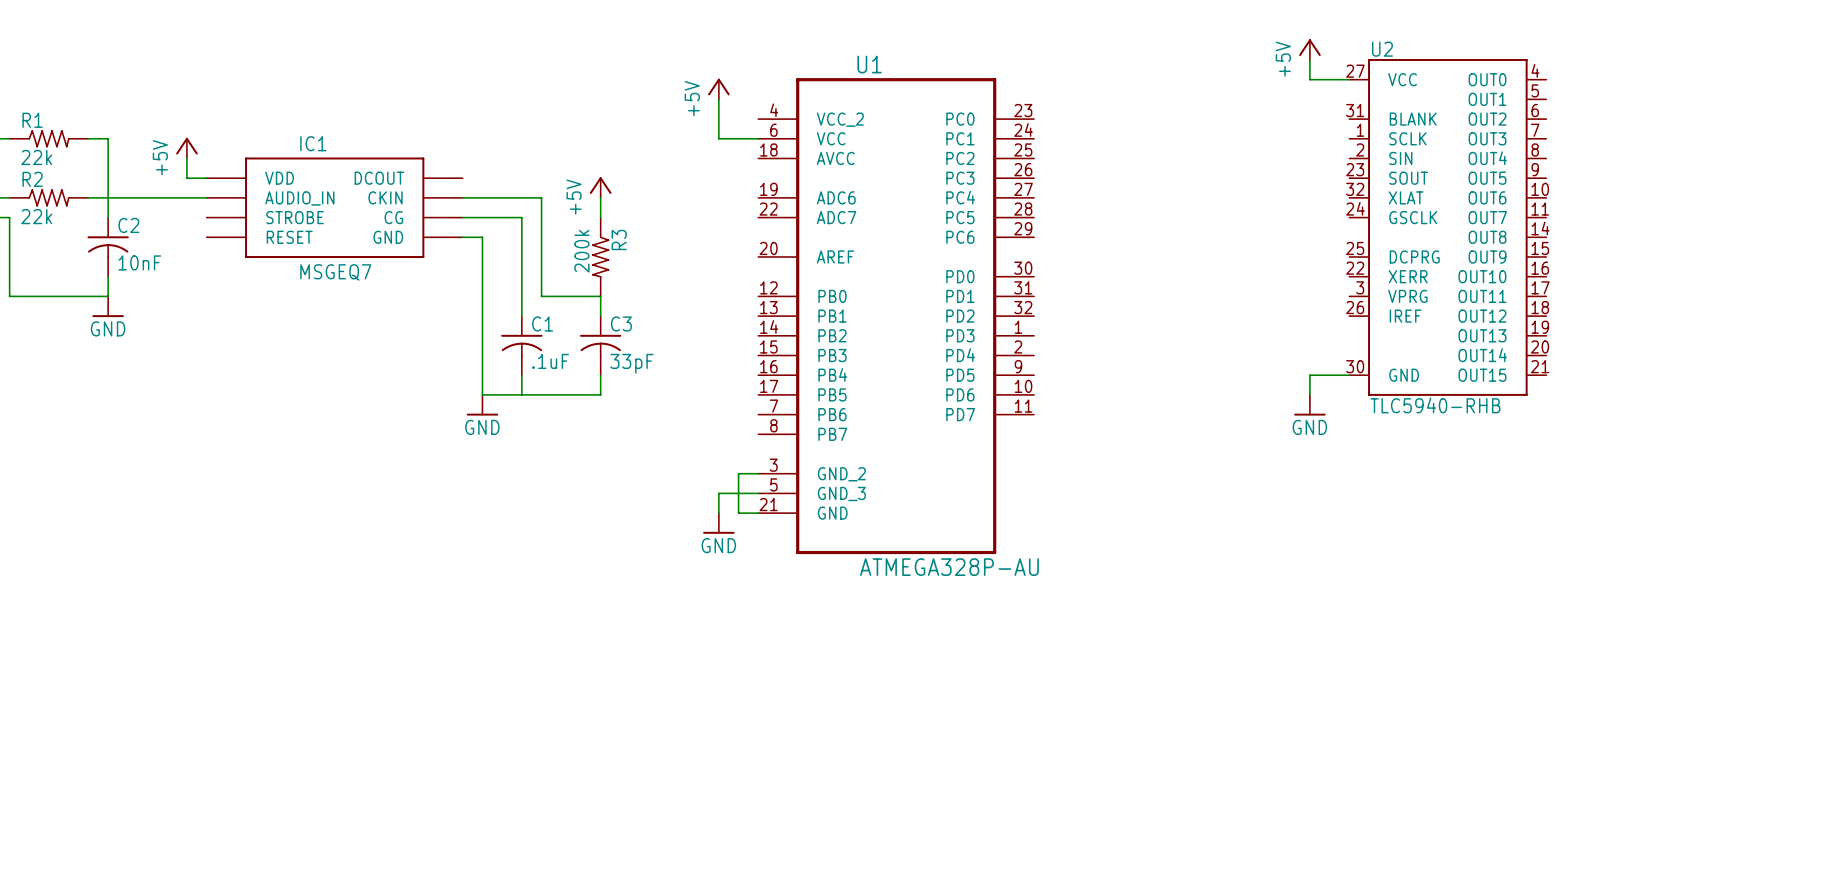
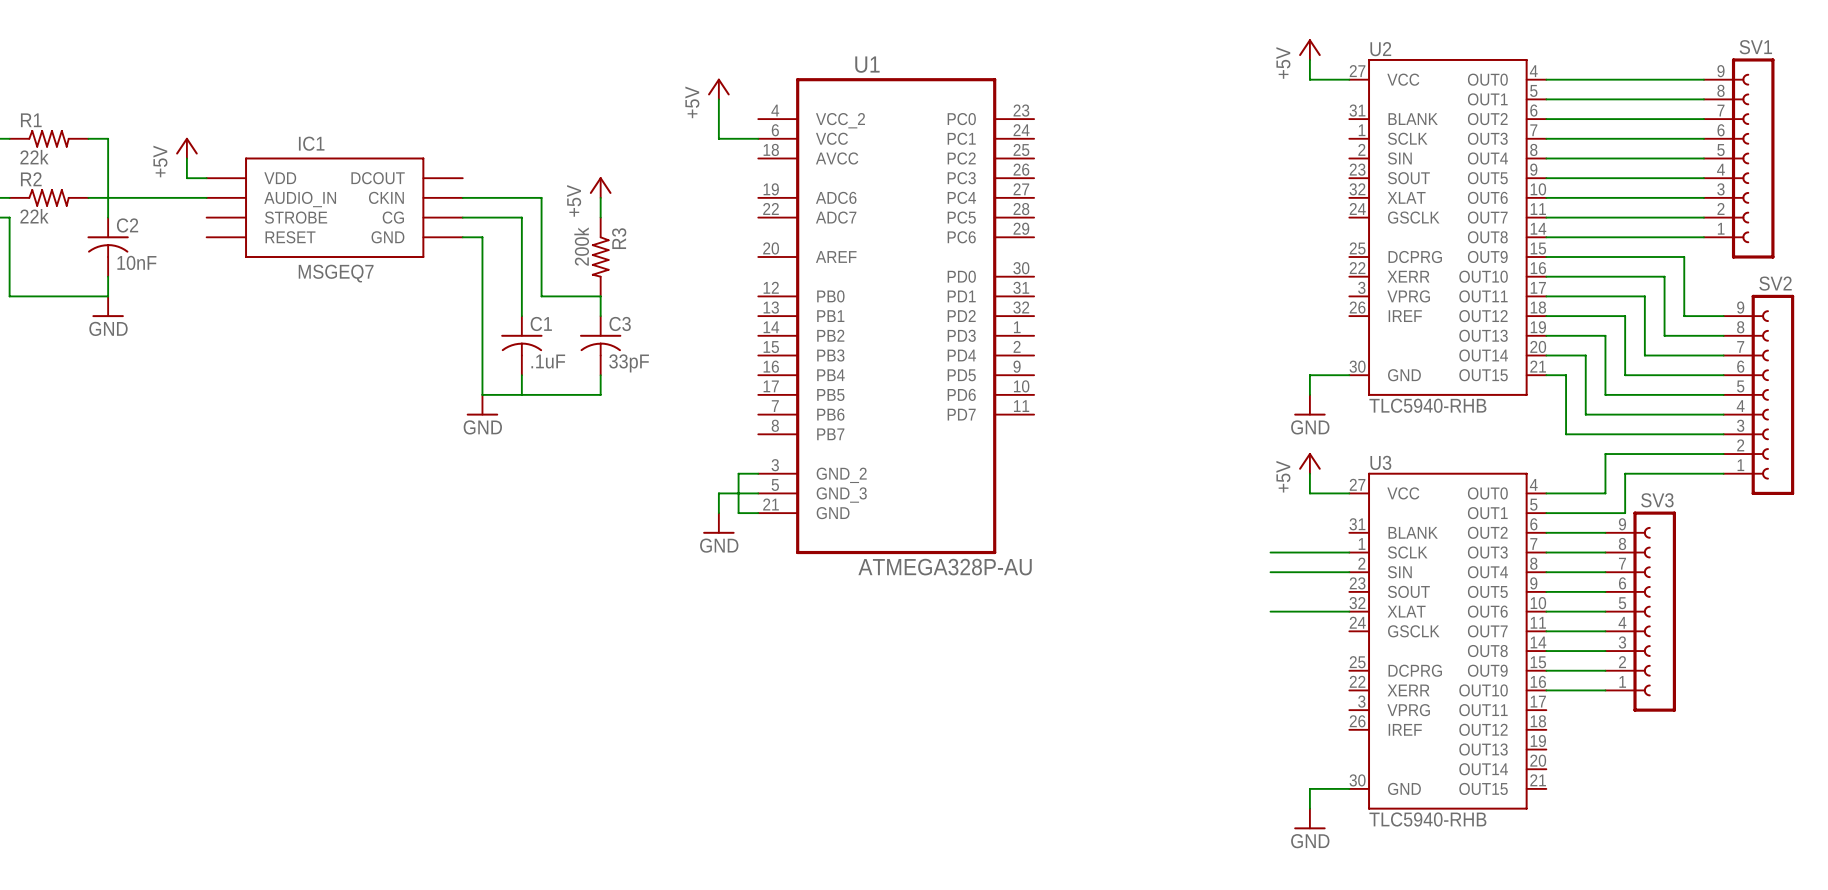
wire: none -> (1546, 79) (1703, 79)
wire: none -> (1546, 99) (1703, 99)
wire: none -> (1546, 119) (1703, 119)
wire: none -> (1546, 138) (1703, 138)
wire: none -> (1546, 158) (1703, 158)
SV1: none -> (1739, 158)
wire: none -> (1546, 178) (1703, 178)
wire: none -> (1546, 197) (1703, 197)
wire: none -> (1546, 217) (1703, 217)
wire: none -> (1546, 237) (1703, 237)
wire: none -> (1546, 257) (1684, 257) (1684, 316) (1723, 316)
wire: none -> (1546, 276) (1664, 276) (1664, 335) (1723, 335)
wire: none -> (1546, 296) (1644, 296) (1644, 355) (1723, 355)
wire: none -> (1546, 316) (1625, 316) (1625, 375) (1723, 375)
wire: none -> (1546, 335) (1605, 335) (1605, 394) (1723, 394)
wire: none -> (1546, 355) (1585, 355) (1585, 414) (1723, 414)
wire: none -> (1546, 375) (1566, 375) (1566, 434) (1723, 434)
SV2: none -> (1758, 394)
wire: none -> (1723, 454) (1605, 454) (1605, 493) (1546, 493)
power symbol: none -> +5V (1309, 463)
wire: none -> (1309, 473) (1309, 493) (1349, 493)
wire: none -> (1723, 473) (1625, 473) (1625, 513) (1546, 513)
wire: none -> (1546, 532) (1605, 532)
wire: none -> (1270, 552) (1349, 552)
wire: none -> (1546, 552) (1605, 552)
wire: none -> (1270, 572) (1349, 572)
wire: none -> (1546, 572) (1605, 572)
wire: none -> (1546, 591) (1605, 591)
wire: none -> (1270, 611) (1349, 611)
wire: none -> (1546, 611) (1605, 611)
SV3: none -> (1640, 611)
wire: none -> (1546, 631) (1605, 631)
U3: none -> TLC5940-RHB (1447, 641)
wire: none -> (1546, 651) (1605, 651)
wire: none -> (1546, 670) (1605, 670)
wire: none -> (1546, 690) (1605, 690)
wire: none -> (1349, 788) (1309, 788) (1309, 808)
power symbol: none -> GND (1309, 818)

